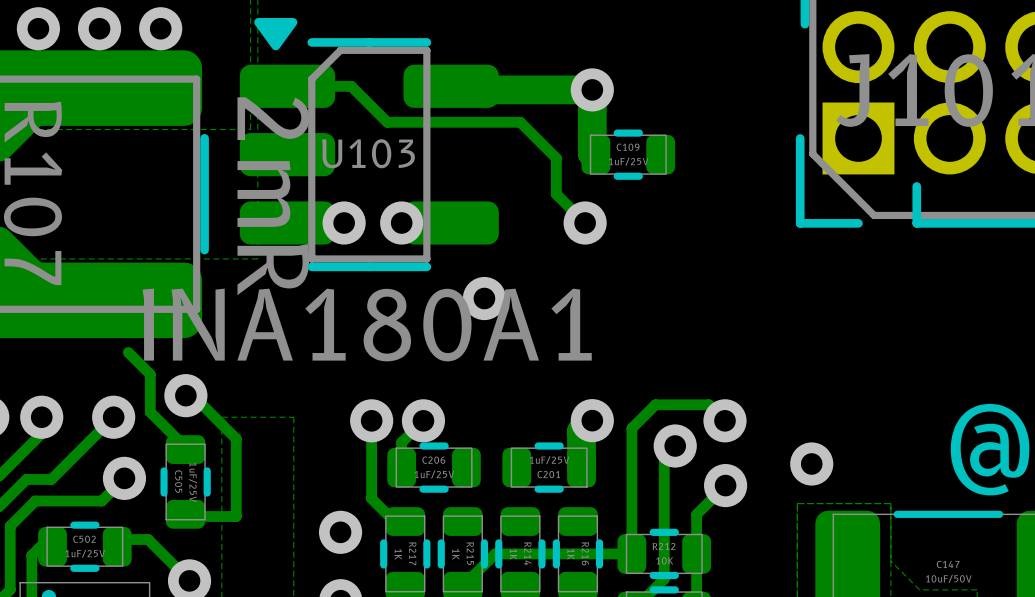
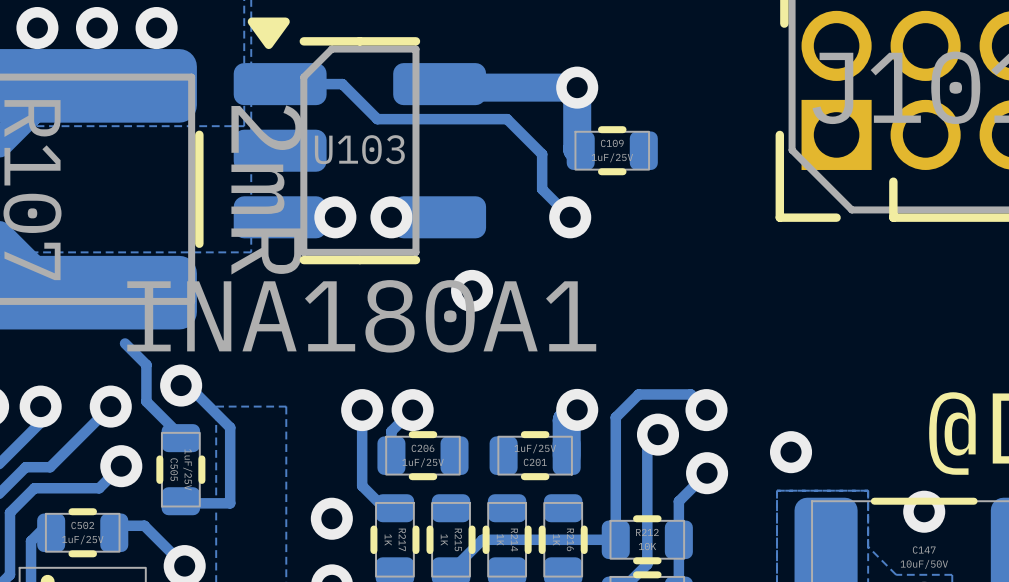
via: none -> (924, 511)

